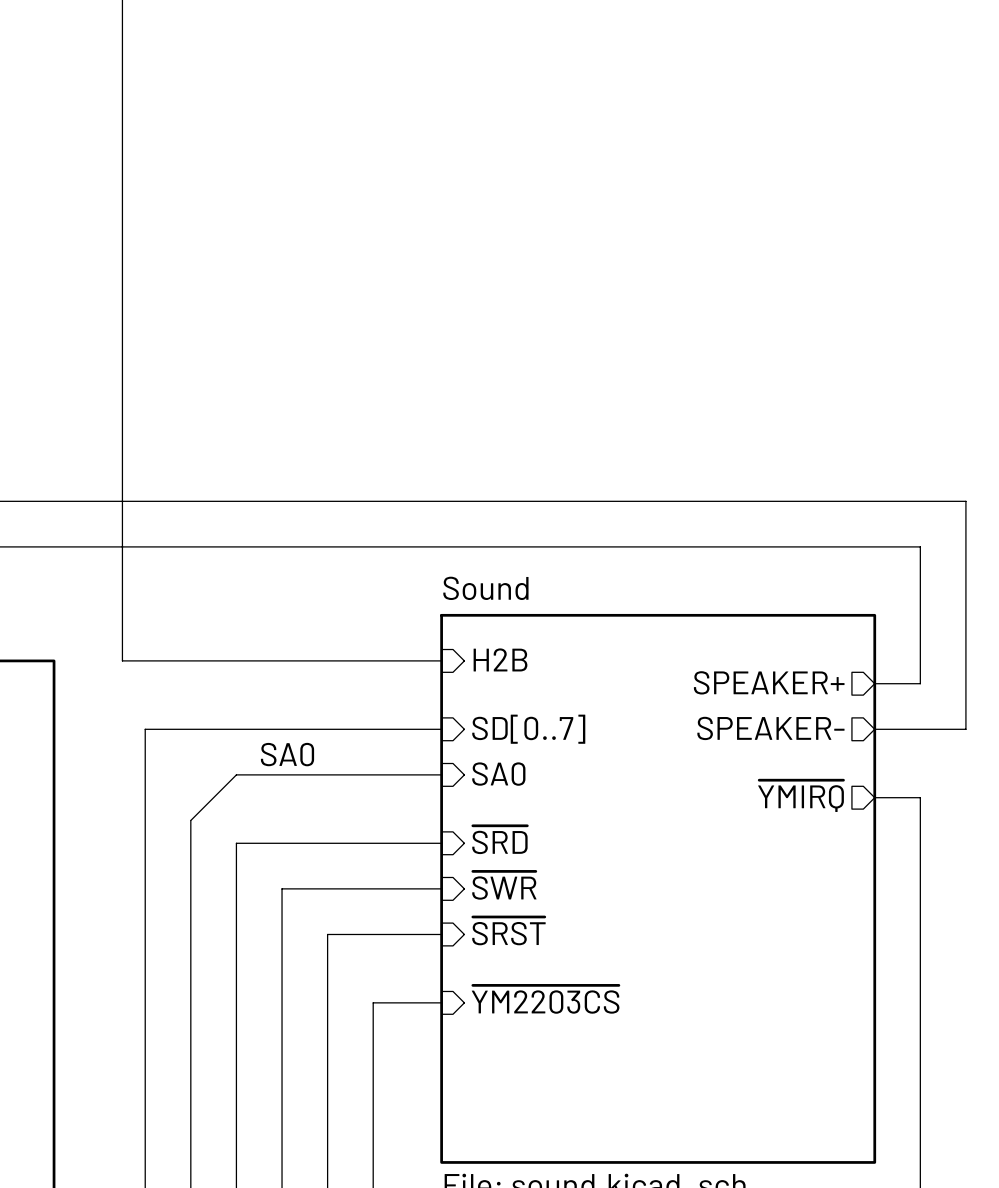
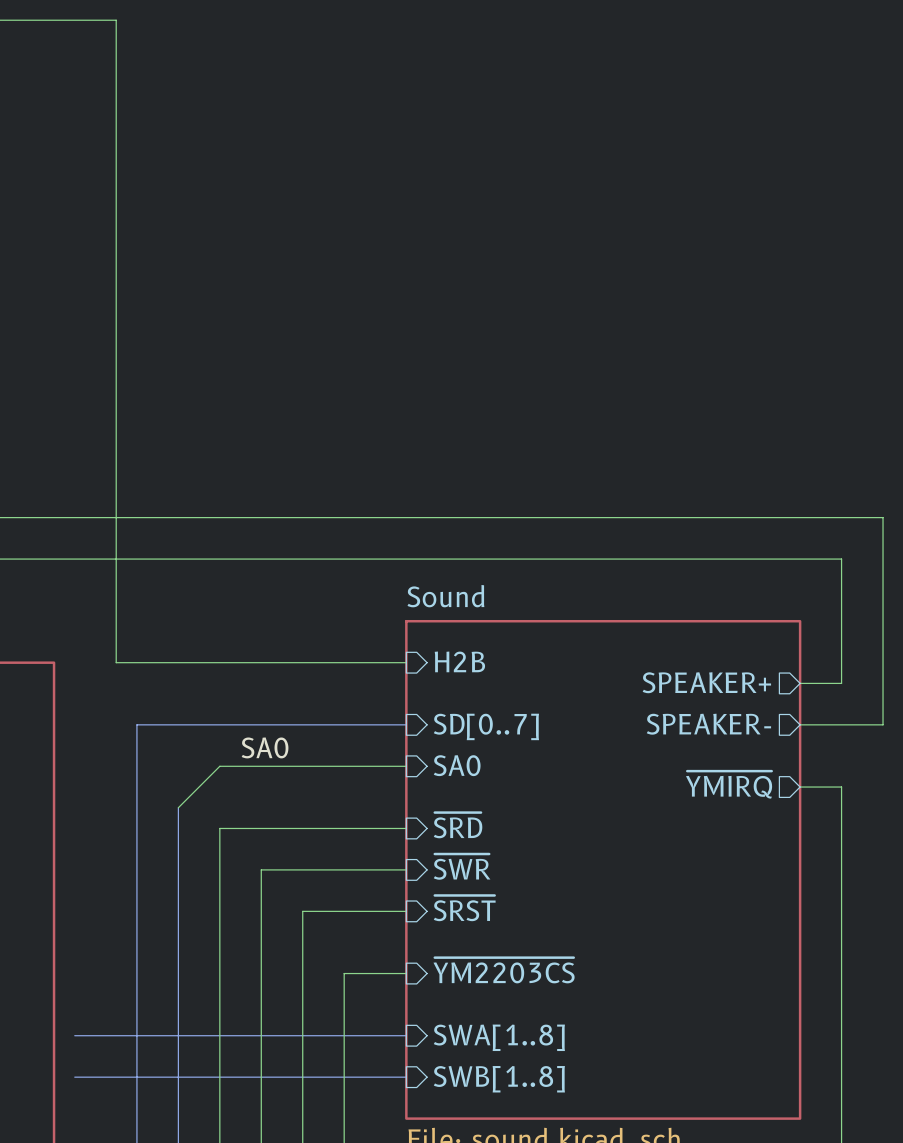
bus: none -> (74, 1035) (406, 1035)
sheet pin: none -> SWA[1..8] (499, 1037)
bus: none -> (74, 1077) (406, 1077)
sheet pin: none -> SWB[1..8] (499, 1079)

